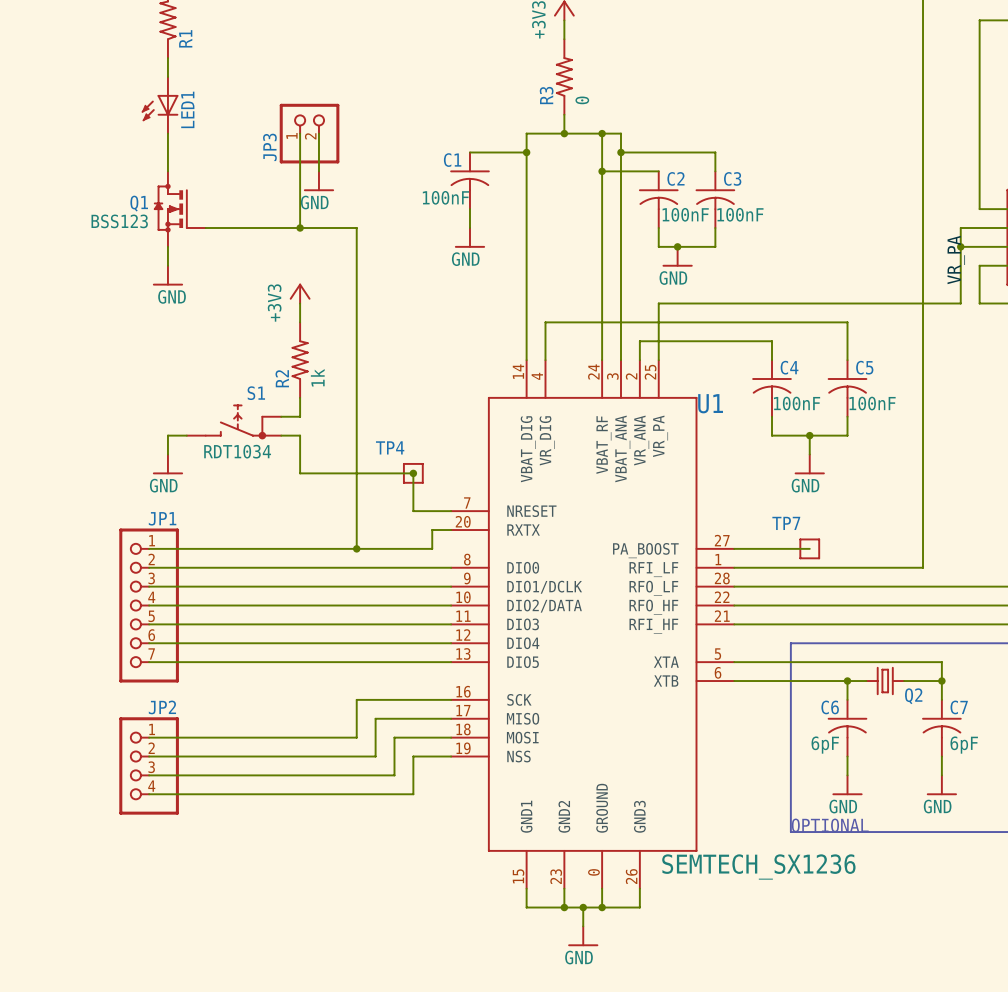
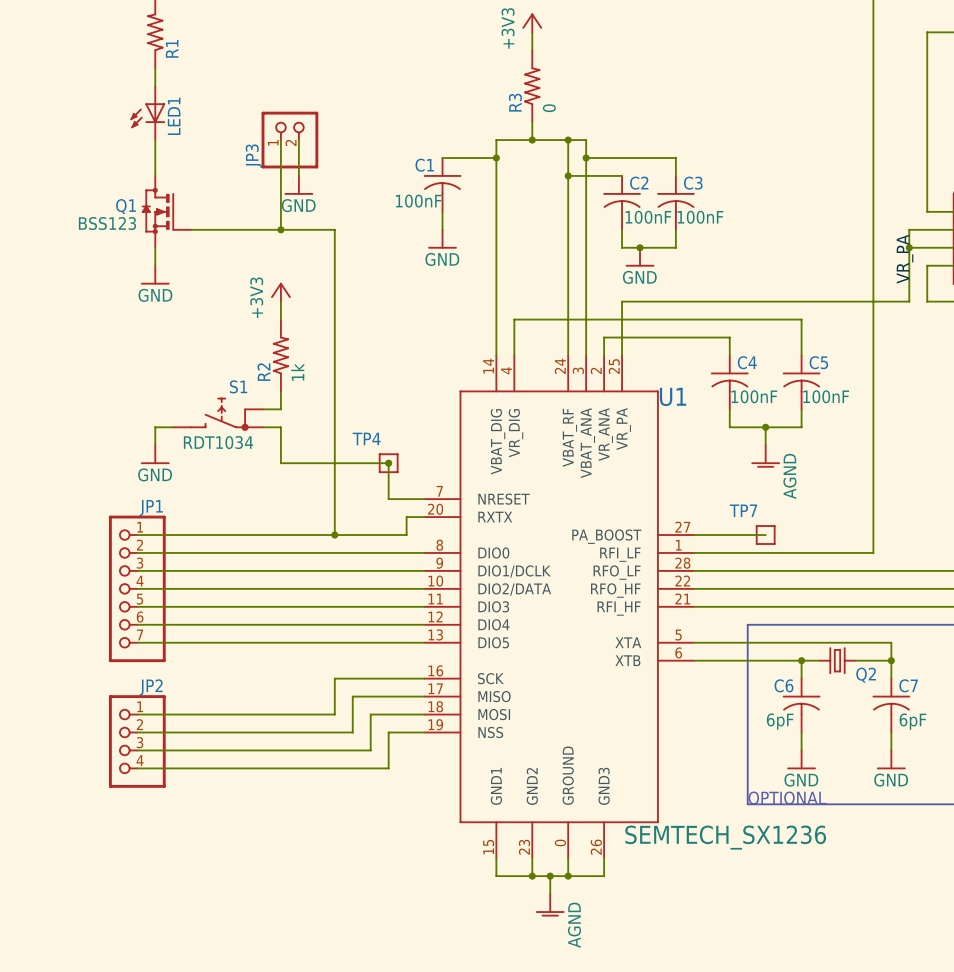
power symbol: GND (809, 464) -> AGND (765, 456)
power symbol: GND (583, 936) -> AGND (550, 905)

